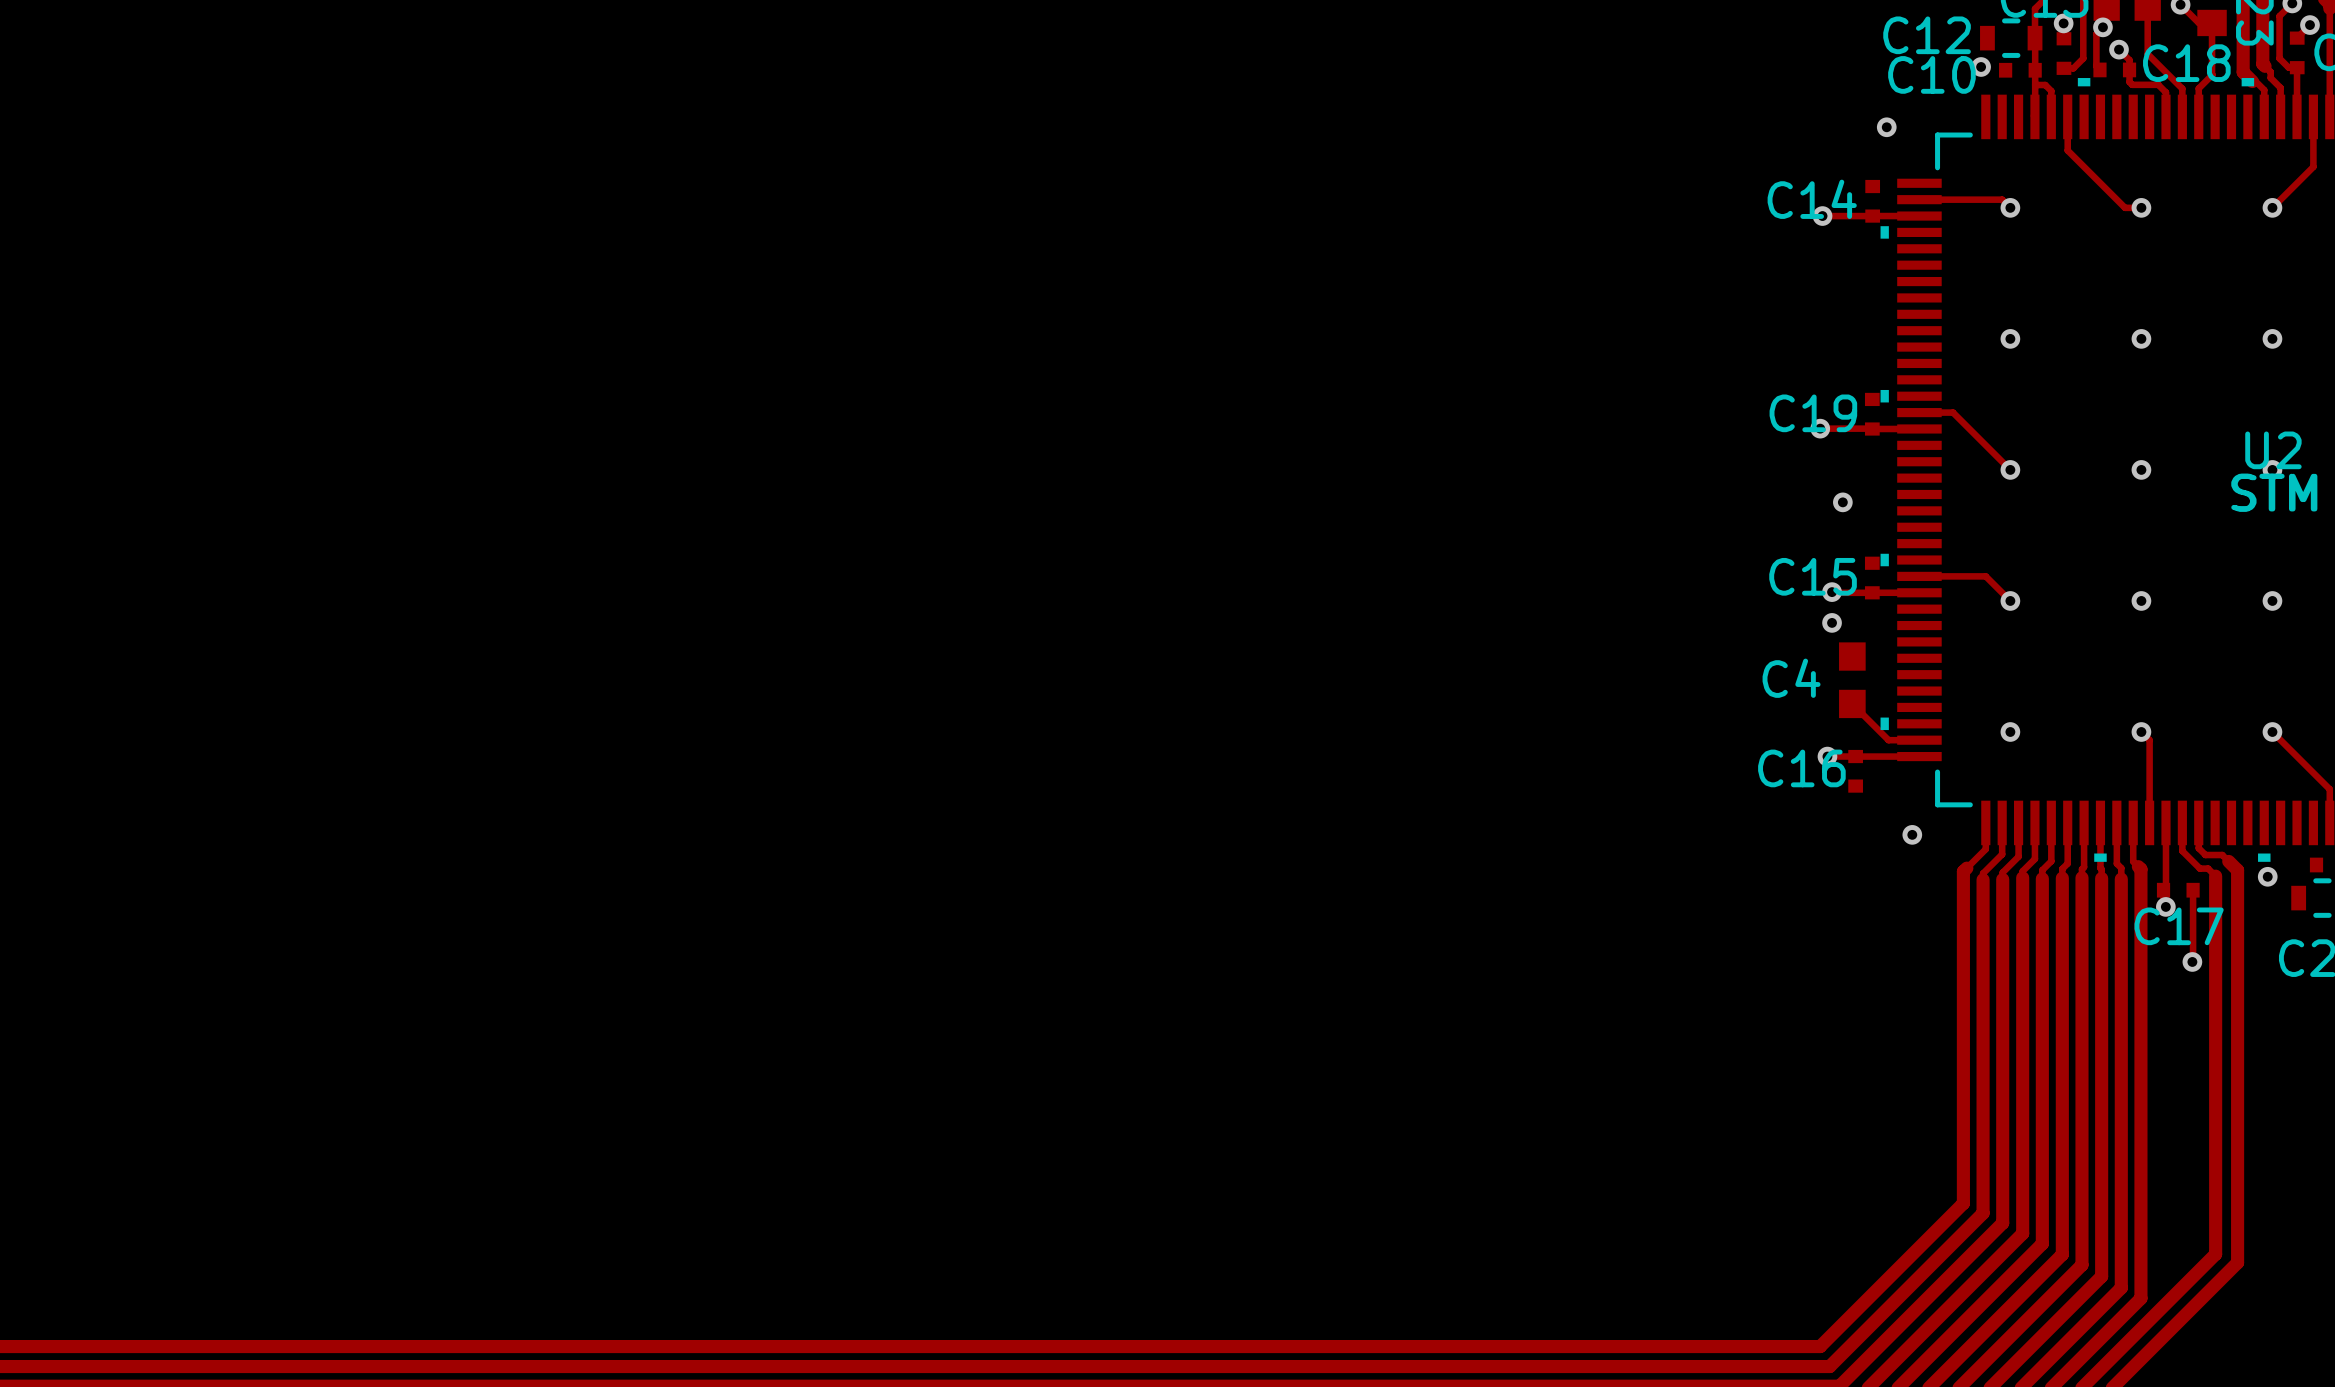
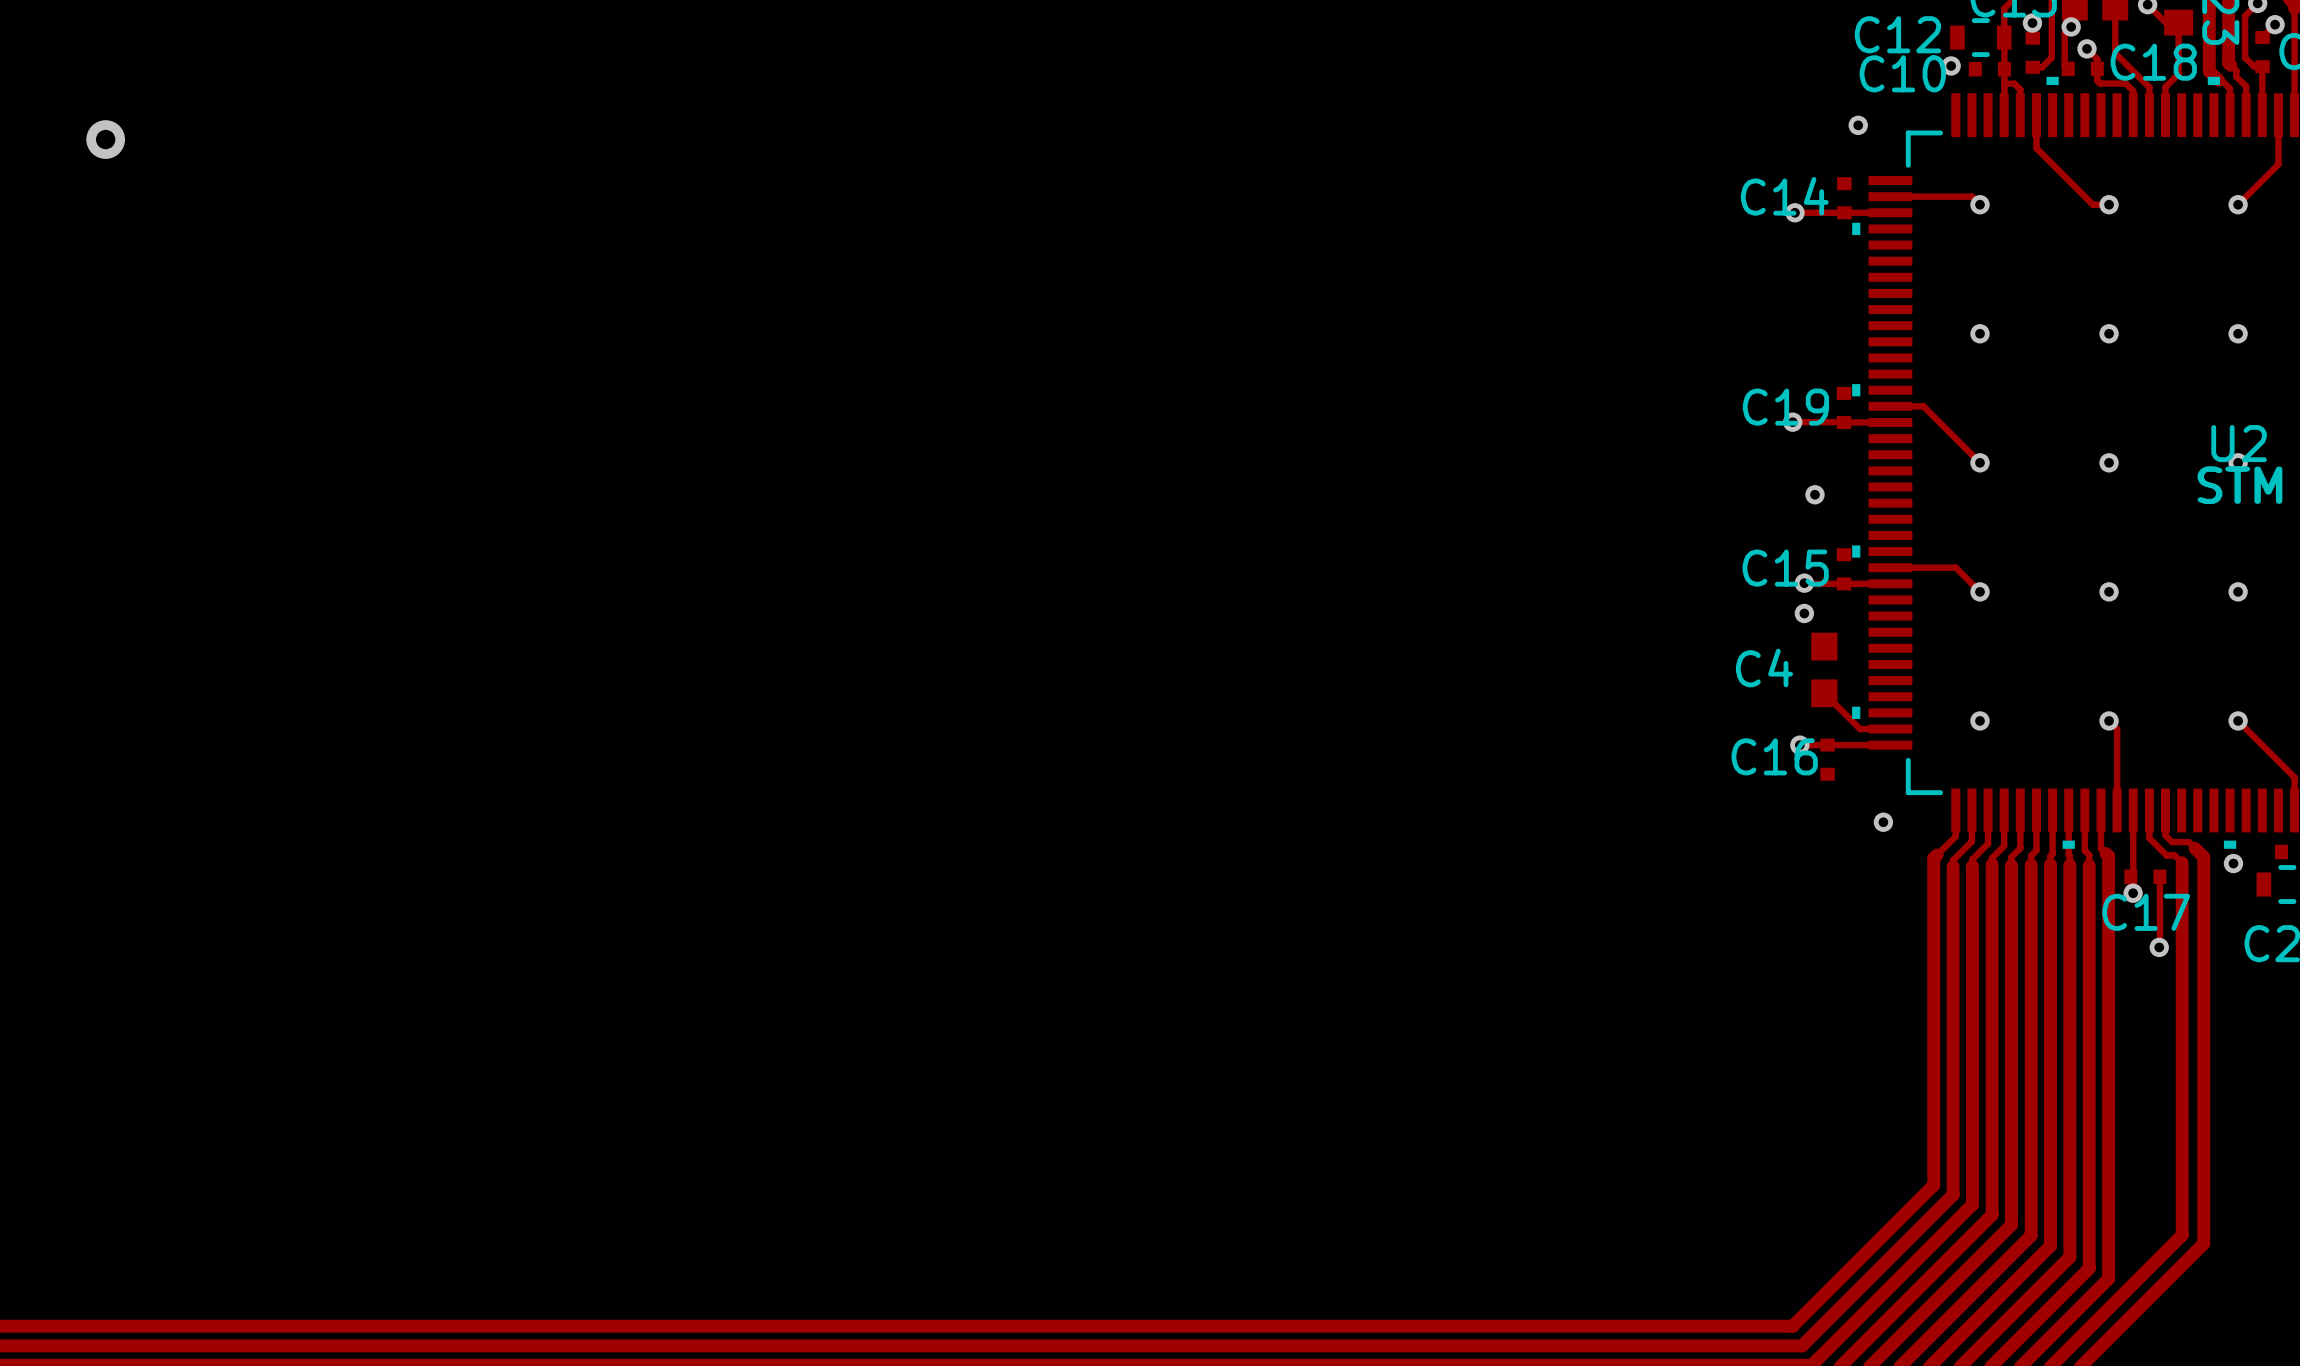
via: none -> (105, 139)

